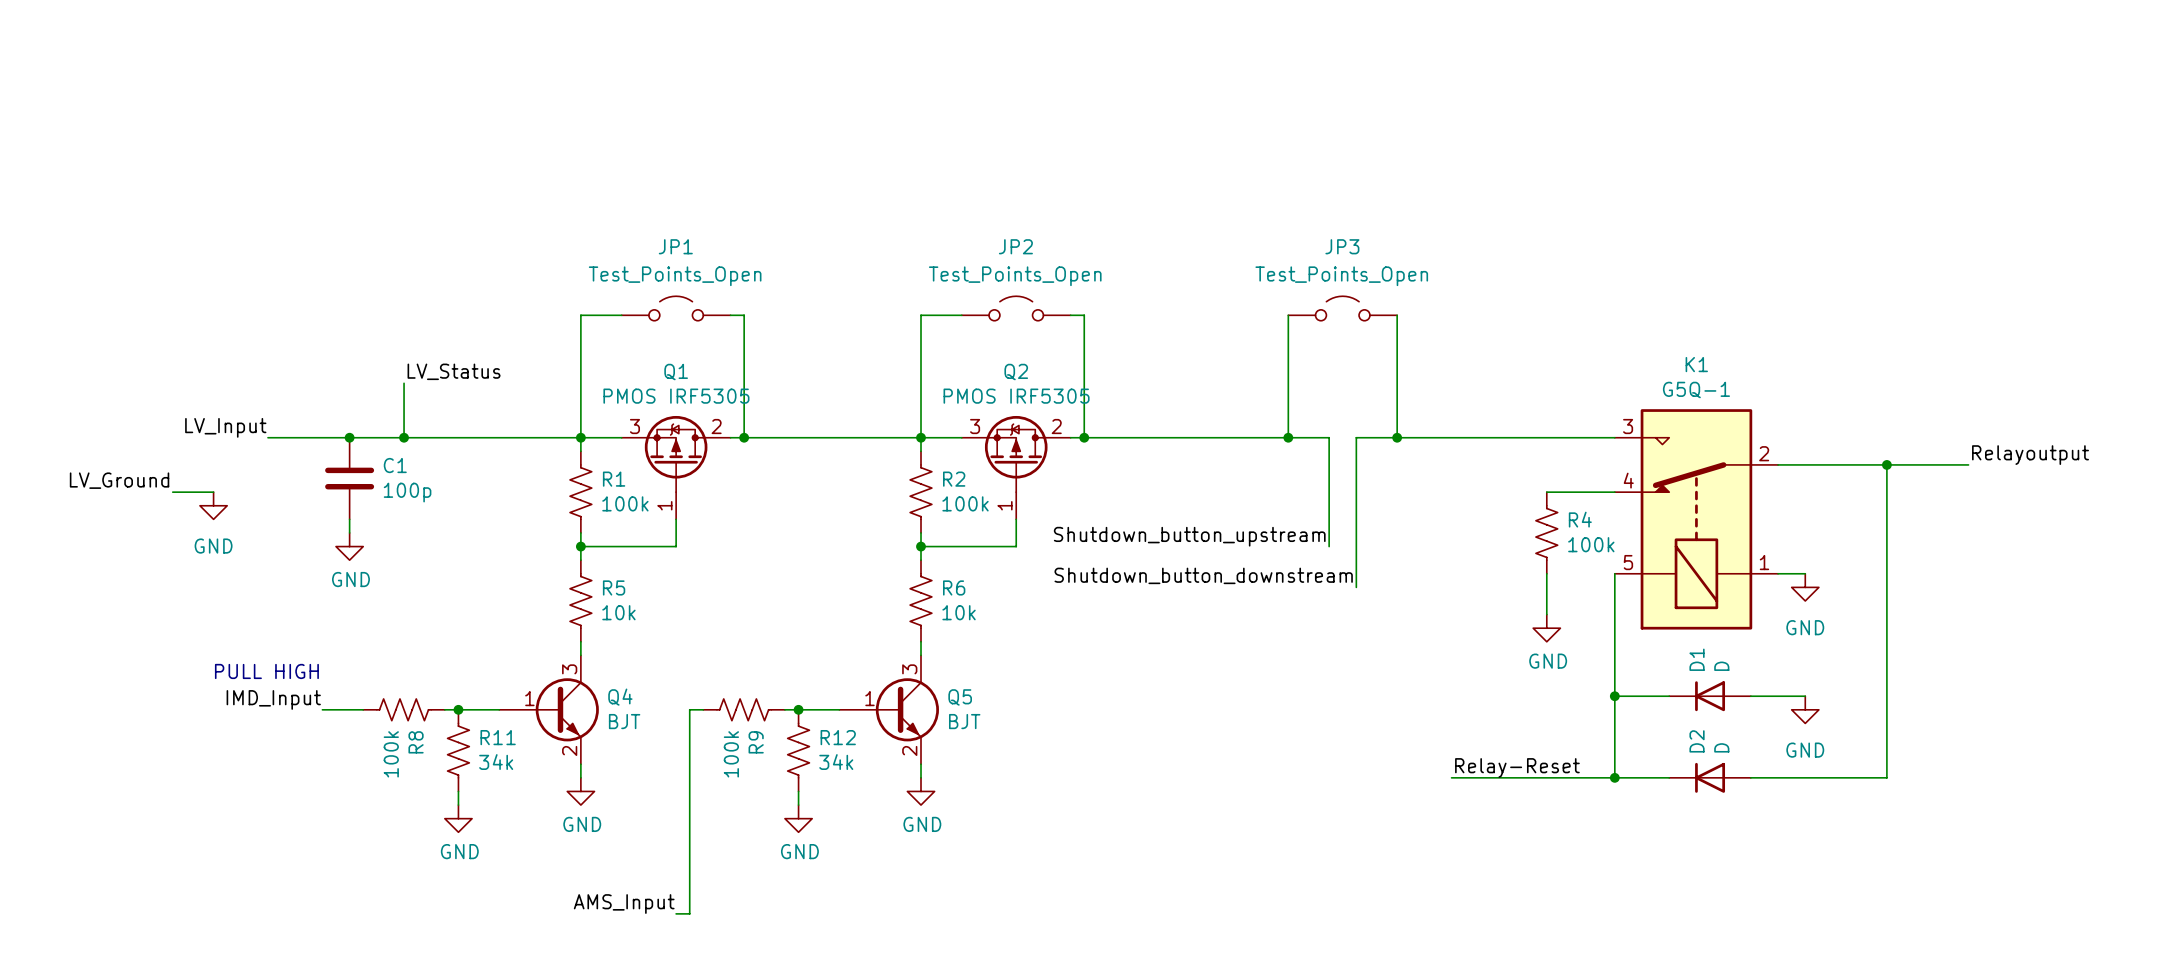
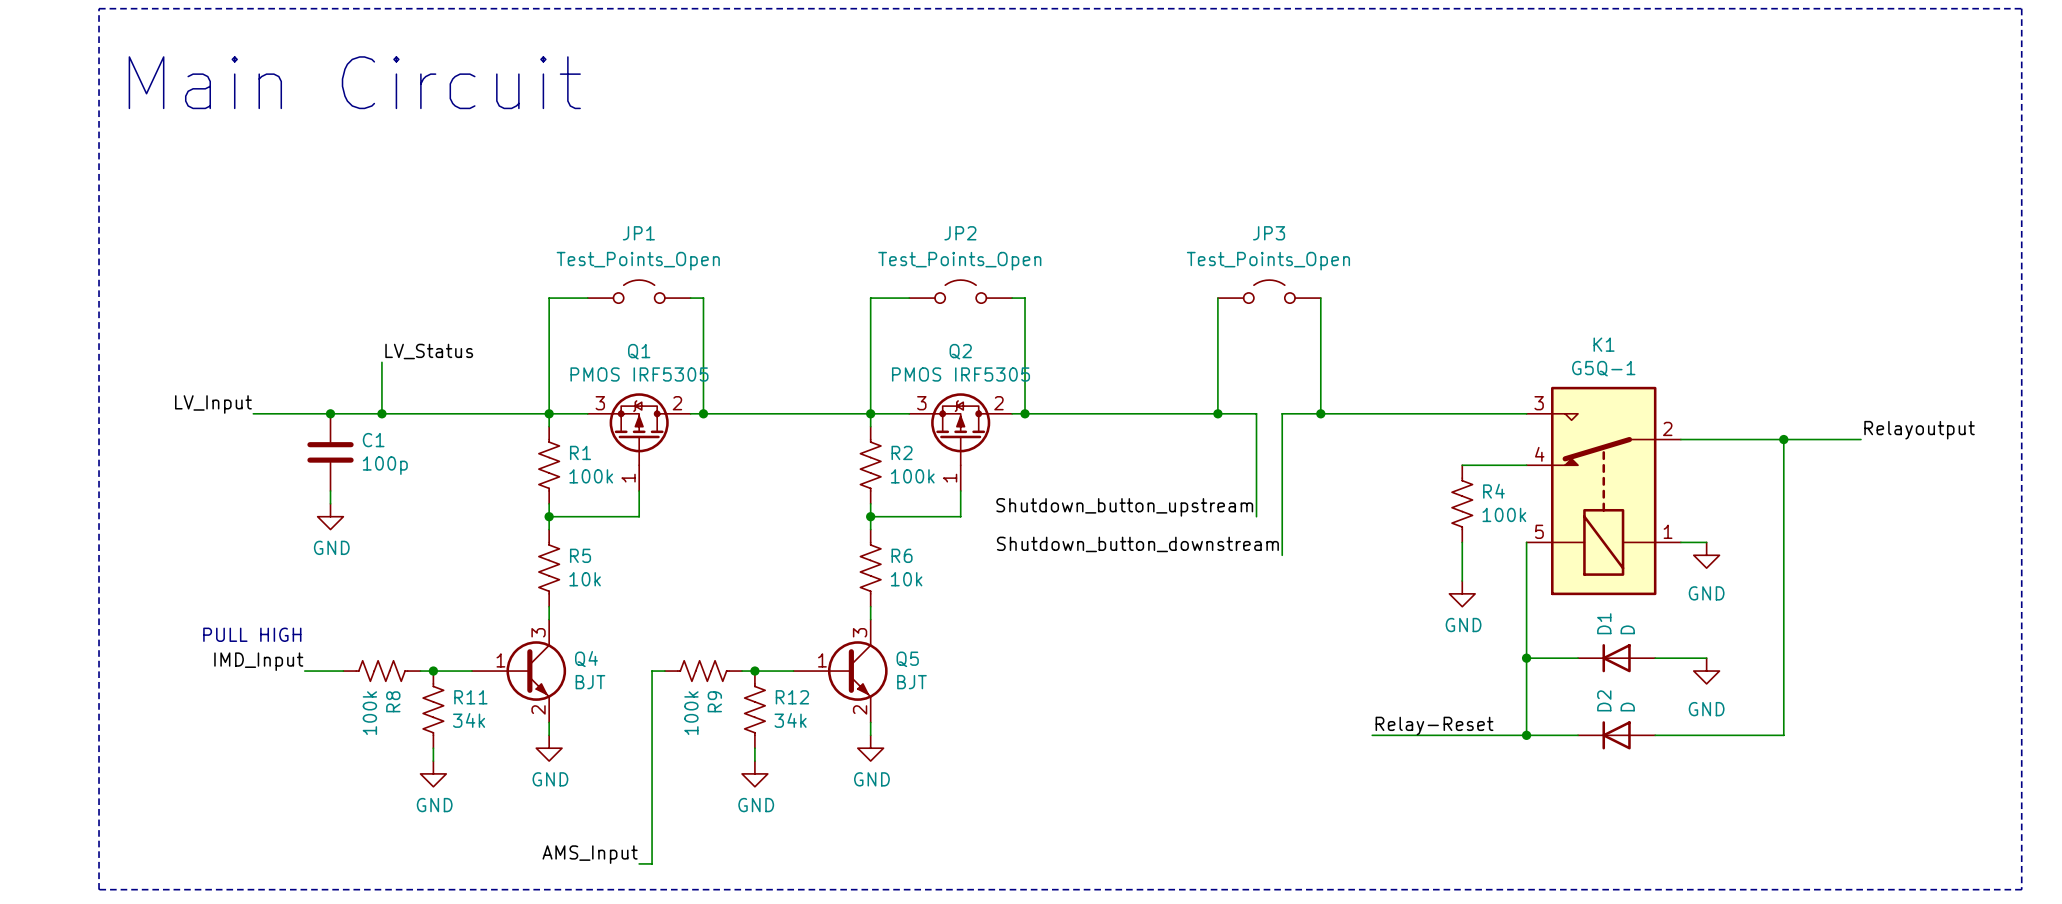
line: none -> (99, 8) (2021, 8) (2021, 889) (99, 889) (99, 8)
text: none -> Main Circuit (354, 82)
label: LV_Ground (119, 480) -> none
wire: (172, 492) (213, 492) -> none
power symbol: GND (213, 505) -> none

